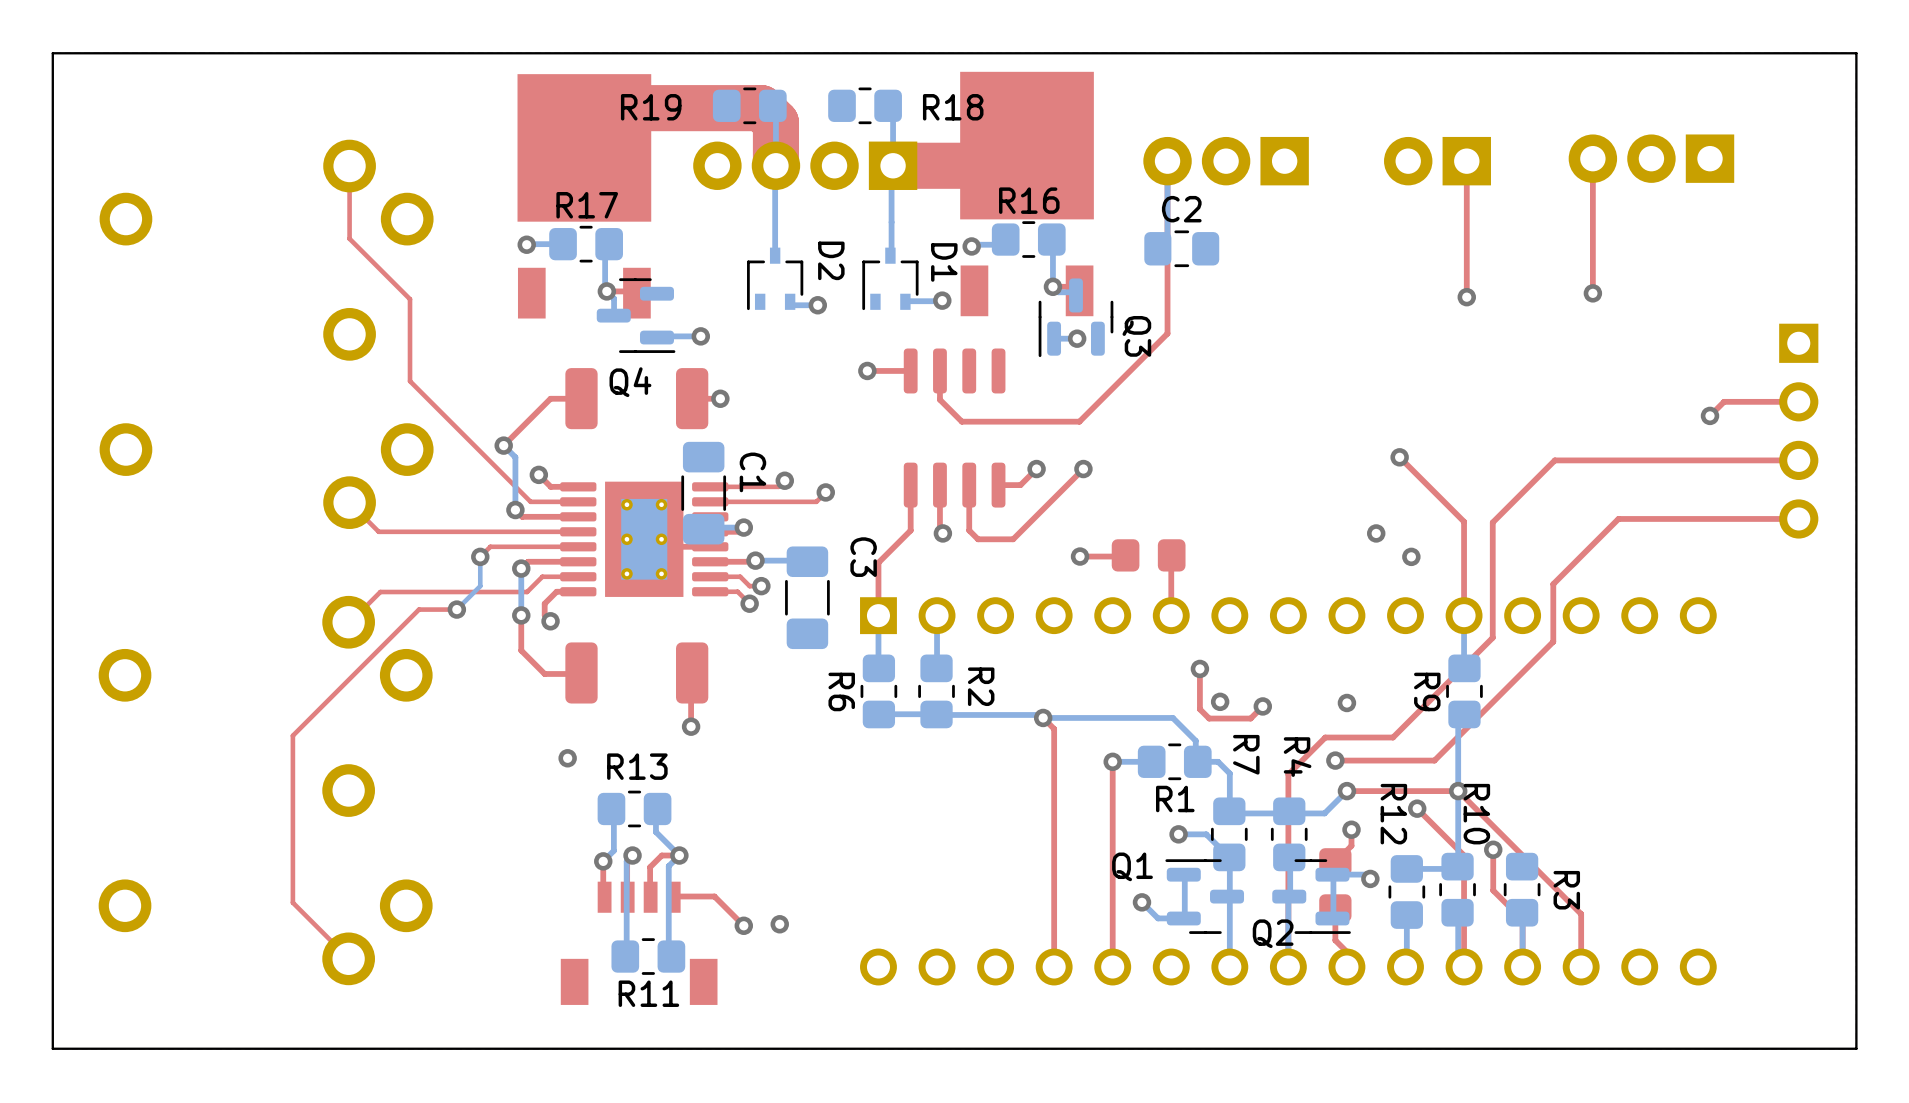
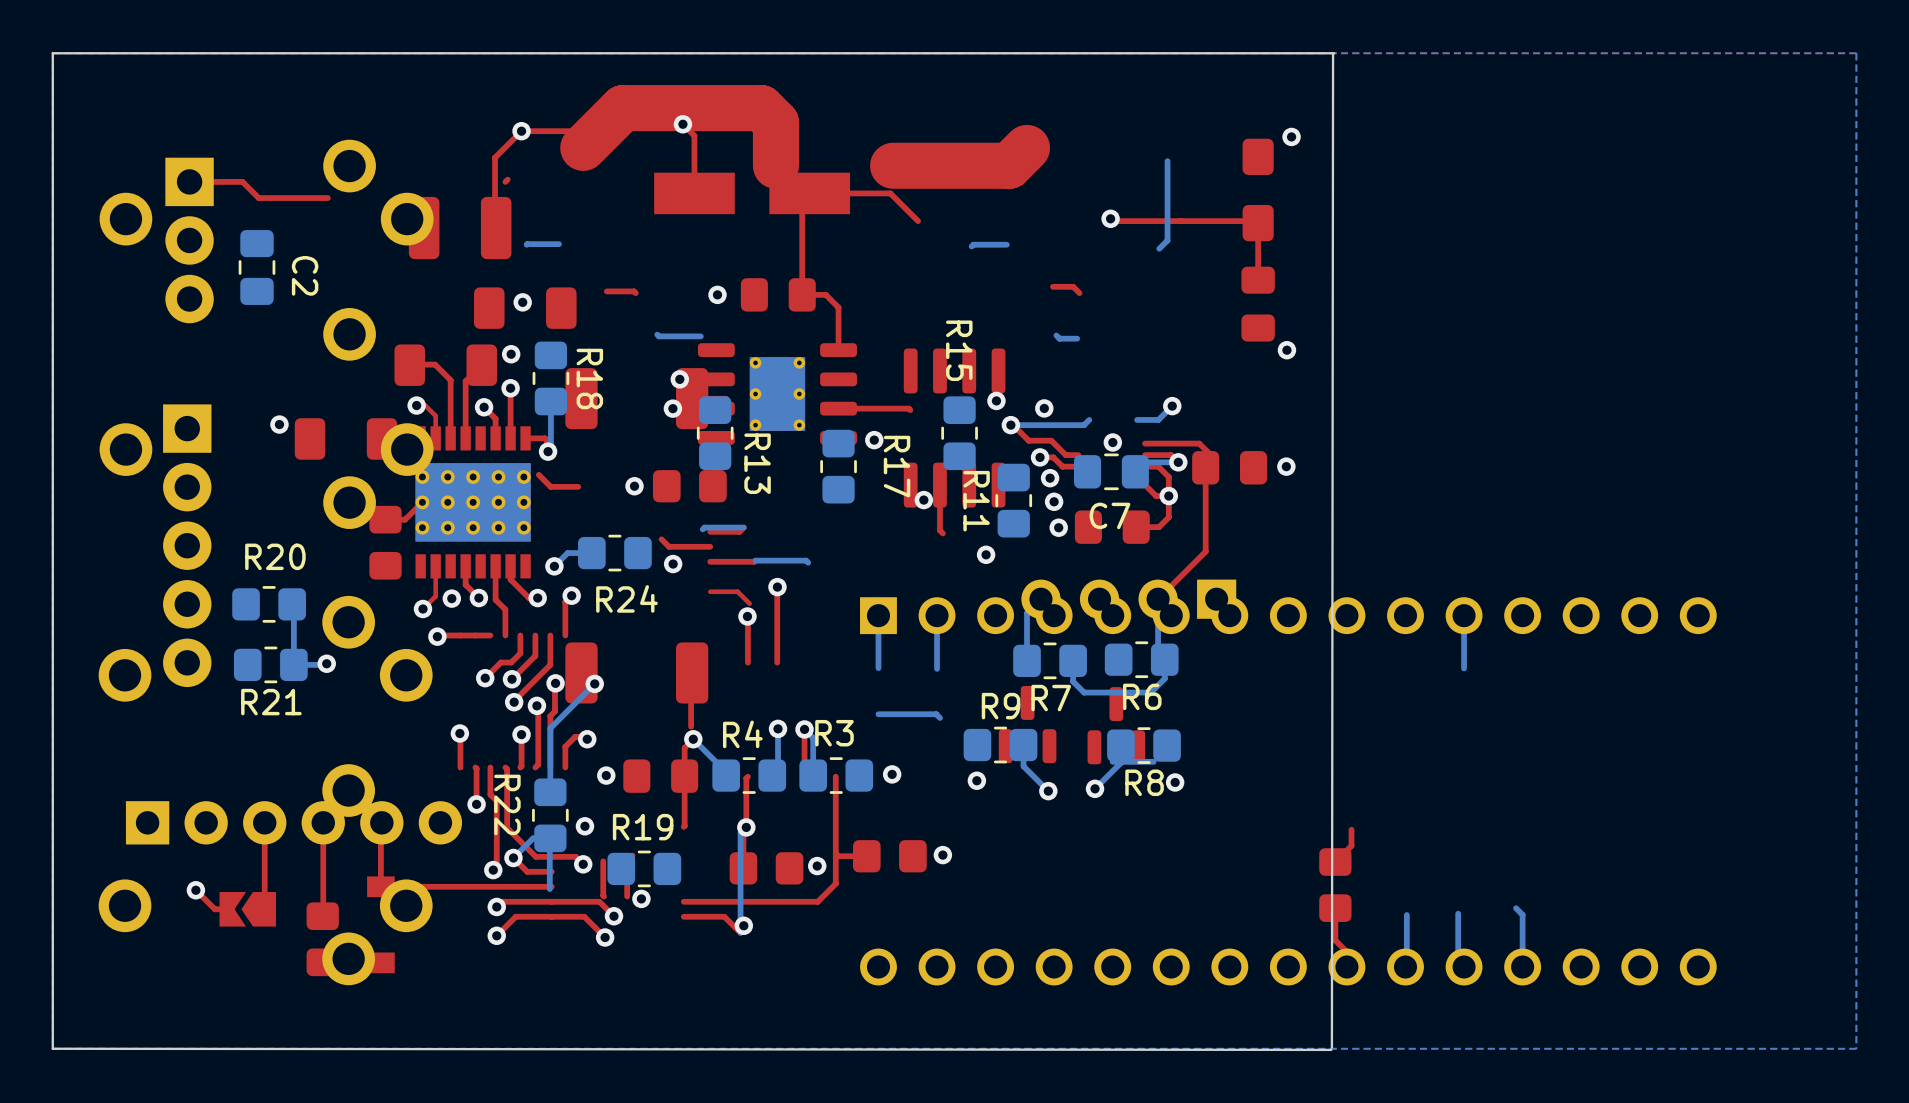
board edge: none -> (1333, 53) (1331, 1047)
board edge: (1334, 53) (1856, 53) (1856, 1048) (52, 1048) -> (1331, 1049) (52, 1048)
R19 position: (749, 105) -> (644, 868)
bottom track: (772, 105) (775, 108) (775, 255) -> none
R18 rotation: 0° (865, 105) -> 90° clockwise (550, 378)
R18 position: (865, 105) -> (550, 378)
bottom track: (888, 105) (893, 110) (892, 255) -> none
R19 name position: R19 (651, 107) -> R19 (643, 827)
R18 name position: R18 (953, 107) -> R18 (589, 379)
top track: none -> (682, 124) (694, 135) (694, 193)
via: none -> (682, 124)
top track: none -> (576, 128) (574, 131) (521, 131) (495, 157) (496, 228)
via: none -> (521, 131)
via: none -> (1291, 136)
top track: (1592, 158) (1592, 293) -> none
part: (1651, 158) -> none
top track: (1167, 161) (1167, 333) (1079, 421) (961, 421) (939, 399) (939, 370) -> none
part: (1226, 161) -> none
part: (1437, 161) -> none
top track: (1466, 161) (1466, 297) -> none
part: (805, 165) -> none
top track: (349, 166) (349, 238) (410, 299) (410, 381) (530, 501) (578, 501) -> none
top track: none -> (507, 179) (505, 181)
top track: none -> (189, 181) (242, 181) (258, 198) (327, 198)
part: none -> (1258, 189)
part: none -> (752, 193)
part: (1027, 194) -> none
part: (584, 196) -> none
top track: none -> (1110, 218) (1112, 221) (1256, 221) (1258, 223) (1258, 280)
via: none -> (1110, 218)
top track: none -> (918, 221) (890, 193) (809, 193) (802, 200) (802, 294) (825, 294) (838, 307) (838, 350)
part: none -> (460, 228)
R16: (1028, 239) -> none
part: none -> (189, 240)
via: (526, 244) -> none
R17 rotation: 0° (586, 244) -> 90° clockwise (838, 466)
R17 position: (586, 244) -> (838, 466)
bottom track: (605, 244) (605, 289) (614, 298) (614, 312) -> none
bottom track: (1052, 244) (1052, 286) (1058, 292) (1078, 292) -> none
via: (971, 246) -> none
C2 rotation: 0° (1181, 248) -> 90° clockwise (257, 267)
C2 position: (1181, 248) -> (257, 267)
D2: (775, 278) -> none
D1: (890, 278) -> none
via: (1052, 286) -> none
via: (606, 291) -> none
via: (1592, 293) -> none
via: none -> (717, 294)
part: none -> (778, 294)
via: (1466, 297) -> none
bottom track: (942, 300) (907, 301) -> none
via: (942, 300) -> none
via: none -> (522, 302)
part: none -> (1258, 304)
bottom track: (817, 305) (790, 305) -> none
via: (817, 305) -> none
part: none -> (525, 308)
Q4: (636, 315) -> none
Q3: (1076, 317) -> none
via: (700, 336) -> none
via: (1077, 338) -> none
via: none -> (1286, 350)
via: none -> (511, 354)
top track: none -> (409, 365) (435, 364) (450, 380) (450, 438)
part: none -> (445, 365)
top track: none -> (481, 365) (465, 381) (465, 438)
via: (867, 370) -> none
top track: (910, 370) (867, 370) -> none
via: none -> (679, 379)
top track: none -> (510, 388) (510, 438)
via: none -> (510, 388)
part: none -> (777, 394)
top track: (579, 398) (550, 398) (503, 445) -> none
via: (720, 398) -> none
via: none -> (996, 400)
bottom track: none -> (550, 401) (550, 448) (548, 451)
top track: (1798, 401) (1724, 401) (1710, 415) -> none
top track: none -> (416, 405) (425, 405) (435, 415) (435, 438)
via: none -> (416, 405)
bottom track: none -> (1172, 406) (1158, 419) (1137, 419)
via: none -> (1172, 406)
top track: none -> (484, 407) (495, 418) (495, 438)
via: none -> (484, 407)
via: none -> (672, 408)
top track: none -> (838, 408) (910, 410)
via: none -> (1044, 408)
via: (1710, 415) -> none
bottom track: none -> (1089, 419) (1084, 425) (1010, 425)
via: none -> (279, 424)
top track: none -> (1010, 425) (1013, 425) (1028, 440) (1051, 440) (1065, 455) (1078, 455)
via: none -> (1010, 425)
part: (1798, 431) -> none
R15: none -> (959, 433)
part: none -> (346, 438)
top track: none -> (525, 438) (545, 438) (548, 451)
via: none -> (874, 440)
via: none -> (1112, 442)
top track: none -> (1145, 443) (1199, 443) (1209, 453) (1209, 464)
bottom track: (503, 445) (515, 457) (515, 510) -> none
via: (503, 445) -> none
via: none -> (548, 451)
top track: none -> (1145, 455) (1171, 455) (1178, 462)
top track: none -> (1040, 457) (1053, 457) (1062, 466) (1078, 466)
via: none -> (1040, 457)
top track: (1399, 457) (1464, 521) (1464, 615) -> none
via: (1399, 457) -> none
top track: (1798, 460) (1554, 460) (1492, 522) (1492, 637) (1393, 737) (1325, 737) (1288, 774) (1288, 967) -> none
bottom track: none -> (1178, 462) (1144, 462) (1135, 471)
via: none -> (1178, 462)
top track: none -> (1145, 466) (1158, 466) (1168, 477) (1168, 517) (1159, 527) (1136, 527)
via: none -> (1286, 466)
top track: none -> (1205, 467) (1205, 551) (1158, 599)
part: none -> (1229, 467)
top track: (1036, 469) (1020, 485) (998, 485) -> none
via: (1036, 469) -> none
top track: (1083, 469) (1013, 539) (978, 539) (969, 530) (969, 485) -> none
via: (1083, 469) -> none
C7: none -> (1111, 471)
via: (538, 474) -> none
via: none -> (1050, 478)
top track: none -> (1145, 478) (1145, 485) (1156, 496) (1168, 496)
top track: (784, 480) (778, 486) (710, 486) -> none
via: (784, 480) -> none
top track: (910, 485) (910, 530) (878, 562) (878, 615) -> none
via: none -> (634, 486)
part: none -> (689, 486)
top track: (825, 492) (816, 501) (710, 501) -> none
via: (825, 492) -> none
C1: (703, 493) -> none
via: none -> (1168, 496)
via: none -> (923, 500)
via: none -> (1054, 501)
top track: (349, 502) (378, 531) (578, 531) -> none
top track: none -> (422, 502) (405, 519) (385, 519)
part: none -> (473, 502)
top track: (515, 510) (522, 516) (578, 516) -> none
via: (515, 510) -> none
top track: (1798, 518) (1618, 518) (1553, 584) (1553, 641) (1434, 760) (1335, 760) -> none
via: (743, 527) -> none
via: none -> (1058, 527)
part: none -> (1112, 527)
via: (942, 533) -> none
via: (1376, 533) -> none
part: (644, 539) -> none
part: none -> (385, 542)
part: none -> (187, 545)
top track: (578, 546) (490, 546) (480, 556) -> none
bottom track: none -> (591, 553) (567, 553) (554, 566)
R24: none -> (614, 553)
via: none -> (986, 554)
part: (1148, 555) -> none
bottom track: (480, 556) (480, 586) (456, 609) -> none
via: (480, 556) -> none
via: (1080, 556) -> none
top track: (1122, 556) (1080, 556) -> none
top track: (1168, 556) (1171, 559) (1171, 615) -> none
via: (1411, 556) -> none
via: (755, 560) -> none
top track: (578, 561) (528, 561) (521, 568) -> none
via: none -> (673, 564)
top track: none -> (435, 566) (435, 596) (422, 608)
top track: none -> (465, 566) (465, 584) (478, 598)
top track: none -> (495, 566) (495, 599) (505, 609) (505, 635)
top track: none -> (510, 566) (510, 579) (529, 598) (537, 598)
via: none -> (554, 566)
bottom track: (521, 568) (521, 615) -> none
via: (521, 568) -> none
top track: (578, 576) (542, 576) (527, 592) (380, 592) (349, 622) -> none
top track: (710, 576) (740, 576) (749, 586) (761, 586) -> none
via position: (761, 586) -> (777, 587)
top track: none -> (777, 587) (777, 662)
top track: (578, 591) (556, 591) (544, 603) (544, 615) (550, 621) -> none
top track: none -> (571, 595) (565, 602) (565, 635)
via: none -> (571, 595)
C3: (807, 597) -> none
via: none -> (478, 598)
via: none -> (537, 598)
bottom track: none -> (1040, 599) (1027, 613) (1027, 660)
part: none -> (1128, 599)
bottom track: none -> (1158, 599) (1158, 653) (1164, 659) (1164, 678) (1150, 692) (1084, 692) (1073, 681) (1073, 660)
via position: (749, 603) -> (747, 616)
R20: none -> (269, 604)
bottom track: none -> (292, 604) (293, 606) (293, 664) (326, 663)
via: none -> (422, 608)
top track: (456, 609) (419, 609) (292, 735) (292, 902) (349, 959) -> none
via position: (456, 609) -> (451, 598)
top track: (521, 615) (521, 650) (544, 673) (580, 673) -> none
via: (521, 615) -> none
top track: none -> (747, 616) (747, 662)
via: (550, 621) -> none
top track: none -> (490, 635) (437, 636)
top track: none -> (520, 635) (520, 653) (511, 662) (500, 662) (485, 678)
top track: none -> (535, 635) (535, 655) (512, 679)
top track: none -> (550, 635) (550, 664) (514, 702)
via: none -> (437, 636)
via: none -> (326, 663)
R21: none -> (270, 664)
top track: (1199, 668) (1199, 709) (1209, 718) (1250, 718) (1262, 706) -> none
via: (1199, 668) -> none
via: none -> (485, 678)
via: none -> (512, 679)
top track: none -> (555, 683) (554, 711) (550, 716) (550, 767)
via: none -> (555, 683)
bottom track: none -> (594, 683) (550, 728) (550, 792)
via: none -> (594, 683)
R6 name position: R6 (841, 691) -> R6 (1142, 696)
R6 rotation: 0° (878, 691) -> 90° clockwise (1141, 659)
R6 position: (878, 691) -> (1141, 659)
R2: (936, 691) -> none
R9 rotation: 0° (1464, 691) -> 90° clockwise (1000, 745)
R9 position: (1464, 691) -> (1000, 745)
via: (1220, 701) -> none
via: none -> (514, 702)
via: (1346, 702) -> none
top track: none -> (536, 705) (538, 764) (535, 767)
via: none -> (536, 705)
via: (1262, 706) -> none
bottom track: (937, 714) (1040, 714) (1043, 717) (1172, 717) (1195, 740) (1195, 761) (1218, 761) (1229, 773) (1229, 813) (1324, 813) (1346, 791) -> none
bottom track: (1464, 714) (1458, 720) (1458, 867) (1406, 868) -> none
top track: (1043, 717) (1054, 728) (1054, 967) -> none
via: (1043, 717) -> none
part: none -> (1027, 724)
part: none -> (1116, 725)
via position: (691, 726) -> (693, 739)
bottom track: none -> (778, 728) (778, 769) (772, 775)
via: none -> (778, 728)
top track: none -> (804, 729) (804, 774) (806, 776)
bottom track: none -> (804, 729) (813, 738) (813, 775)
via: none -> (804, 729)
top track: none -> (459, 733) (460, 767)
via: none -> (459, 733)
top track: none -> (521, 734) (520, 767)
via: none -> (521, 734)
top track: none -> (587, 739) (584, 736) (575, 736) (565, 746) (565, 767)
via: none -> (587, 739)
top track: none -> (693, 739) (684, 747) (683, 826)
bottom track: none -> (693, 739) (726, 772) (726, 775)
bottom track: none -> (1023, 745) (1023, 766) (1048, 791)
bottom track: none -> (1120, 745) (1120, 762) (1095, 788)
R8: none -> (1144, 745)
R7 name position: R7 (1246, 754) -> R7 (1051, 698)
via: (567, 758) -> none
via: (1335, 760) -> none
top track: (1112, 761) (1112, 967) -> none
via position: (1112, 761) -> (1095, 788)
R1: (1174, 761) -> none
top track: none -> (475, 767) (476, 804)
top track: none -> (490, 767) (490, 794) (496, 800) (496, 866) (493, 870)
top track: none -> (505, 767) (507, 769) (507, 828) (535, 856) (575, 856) (583, 864)
via: none -> (892, 774)
via: none -> (606, 775)
part: none -> (660, 776)
top track: none -> (747, 776) (746, 778) (746, 827) (743, 830) (743, 868)
top track: none -> (835, 776) (835, 883) (817, 901) (683, 901)
via: none -> (976, 780)
via: none -> (1175, 782)
via: none -> (1048, 791)
top track: (1346, 791) (1458, 791) (1581, 914) (1581, 967) -> none
via: (1346, 791) -> none
via: (1458, 791) -> none
via: none -> (476, 804)
bottom track: (613, 808) (613, 850) (603, 861) -> none
R13 rotation: 0° (634, 808) -> 90° clockwise (715, 433)
R13 position: (634, 808) -> (715, 433)
bottom track: (655, 808) (655, 832) (679, 855) (668, 866) (668, 955) -> none
top track: (1417, 808) (1464, 855) (1464, 967) -> none
via: (1417, 808) -> none
R22: none -> (550, 815)
top track: none -> (264, 822) (264, 909)
part: none -> (294, 822)
top track: none -> (323, 822) (322, 916)
top track: none -> (381, 822) (380, 886) (551, 886)
via: none -> (584, 826)
bottom track: none -> (746, 827) (740, 833) (740, 932)
via: none -> (746, 827)
via: (1351, 829) -> none
bottom track: (1178, 834) (1206, 834) (1229, 857) -> none
via: (1178, 834) -> none
R7 rotation: 0° (1229, 834) -> 90° clockwise (1050, 660)
R7 position: (1229, 834) -> (1050, 660)
R4 rotation: 0° (1289, 834) -> 90° clockwise (749, 775)
R4 position: (1289, 834) -> (749, 775)
top track: (1493, 849) (1493, 890) (1522, 919) (1522, 967) -> none
via: (1493, 849) -> none
top track: none -> (835, 853) (838, 856) (866, 856)
bottom track: (632, 855) (626, 861) (626, 955) -> none
via: (632, 855) -> none
top track: (679, 855) (661, 855) (650, 867) (650, 896) -> none
via: (679, 855) -> none
via: none -> (942, 855)
bottom track: (1229, 855) (1229, 894) (1228, 896) (1229, 898) (1229, 967) -> none
bottom track: (1288, 855) (1290, 857) (1288, 967) -> none
part: none -> (889, 856)
top track: none -> (513, 857) (527, 871) (551, 871)
bottom track: none -> (513, 857) (533, 838) (550, 838) (549, 889)
via: none -> (513, 857)
via: (603, 861) -> none
via: none -> (583, 864)
via: none -> (817, 866)
part: none -> (766, 868)
via: none -> (493, 870)
bottom track: (1184, 874) (1184, 918) (1158, 918) (1141, 902) -> none
bottom track: (1370, 878) (1366, 874) (1333, 874) (1333, 918) -> none
via: (1370, 878) -> none
R10: (1457, 889) -> none
R3 rotation: 0° (1522, 889) -> 90° clockwise (836, 775)
R3 position: (1522, 889) -> (836, 775)
top track: none -> (195, 890) (214, 909) (231, 909)
via: none -> (195, 890)
R3 name position: R3 (1566, 890) -> R3 (834, 733)
R12: (1406, 891) -> none
top track: (673, 896) (714, 896) (743, 925) -> none
Q1: (1204, 896) -> none
Q2: (1311, 896) -> none
via: none -> (641, 898)
via: (1141, 902) -> none
top track: none -> (496, 906) (501, 901) (599, 901) (613, 916)
via: none -> (496, 906)
part: none -> (247, 909)
via: none -> (613, 916)
top track: none -> (683, 916) (724, 916) (740, 932)
part: none -> (380, 924)
via: (779, 924) -> none
top track: none -> (496, 935) (515, 916) (584, 916) (605, 937)
via: none -> (496, 935)
via: none -> (605, 937)
part: none -> (322, 939)
part: (639, 943) -> none
R11 rotation: 0° (648, 956) -> 90° clockwise (1013, 500)
R11 position: (648, 956) -> (1013, 500)

